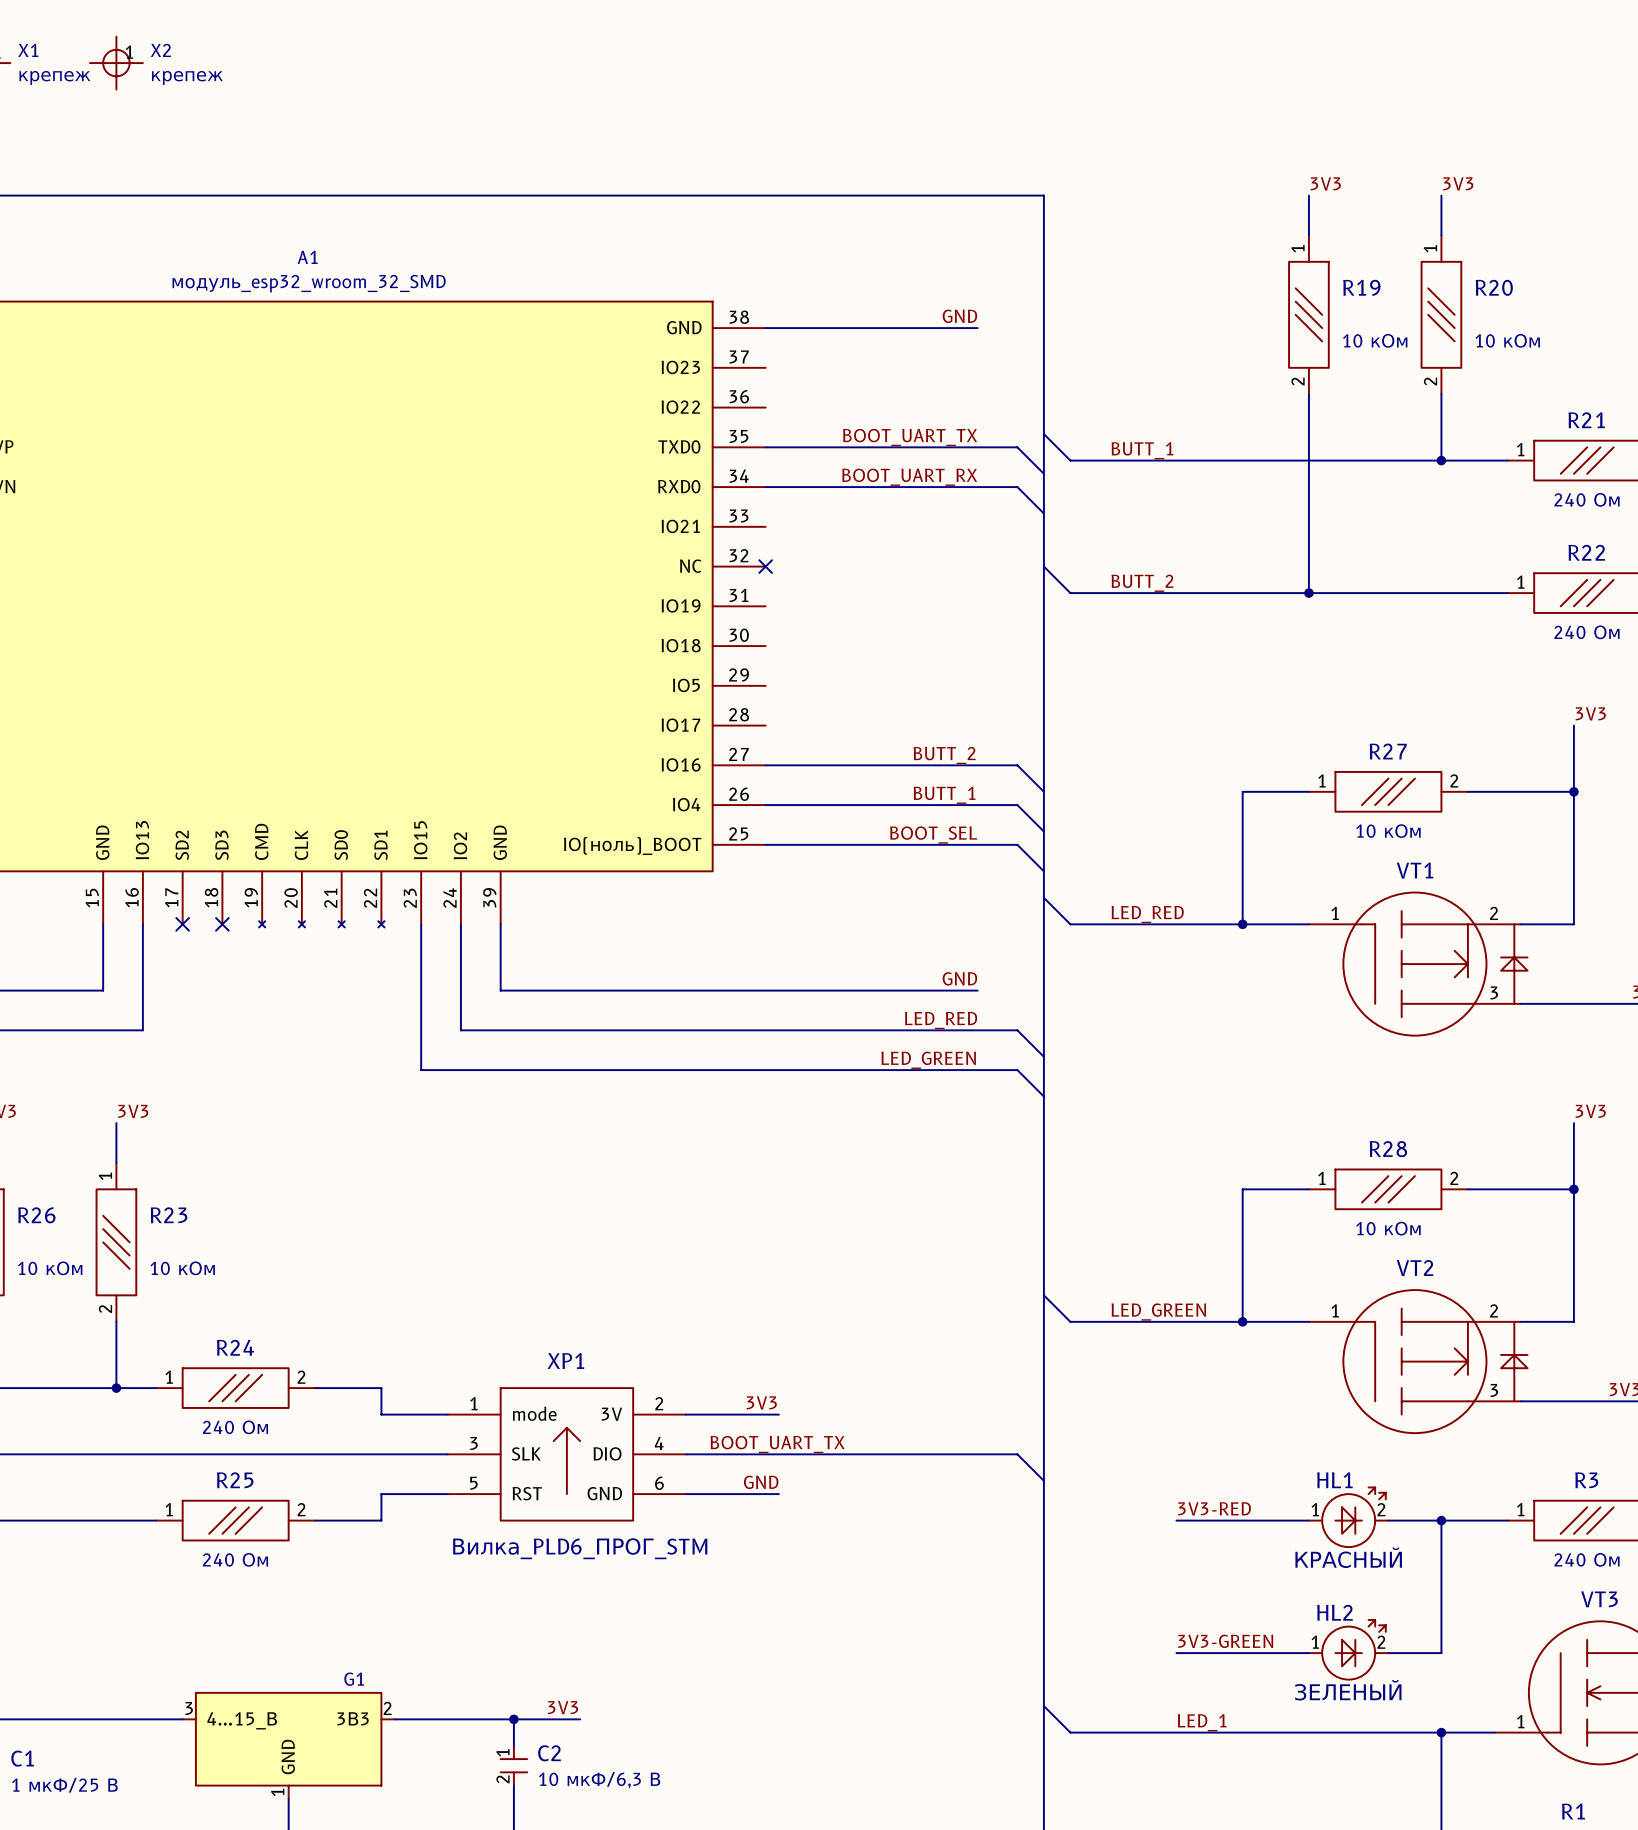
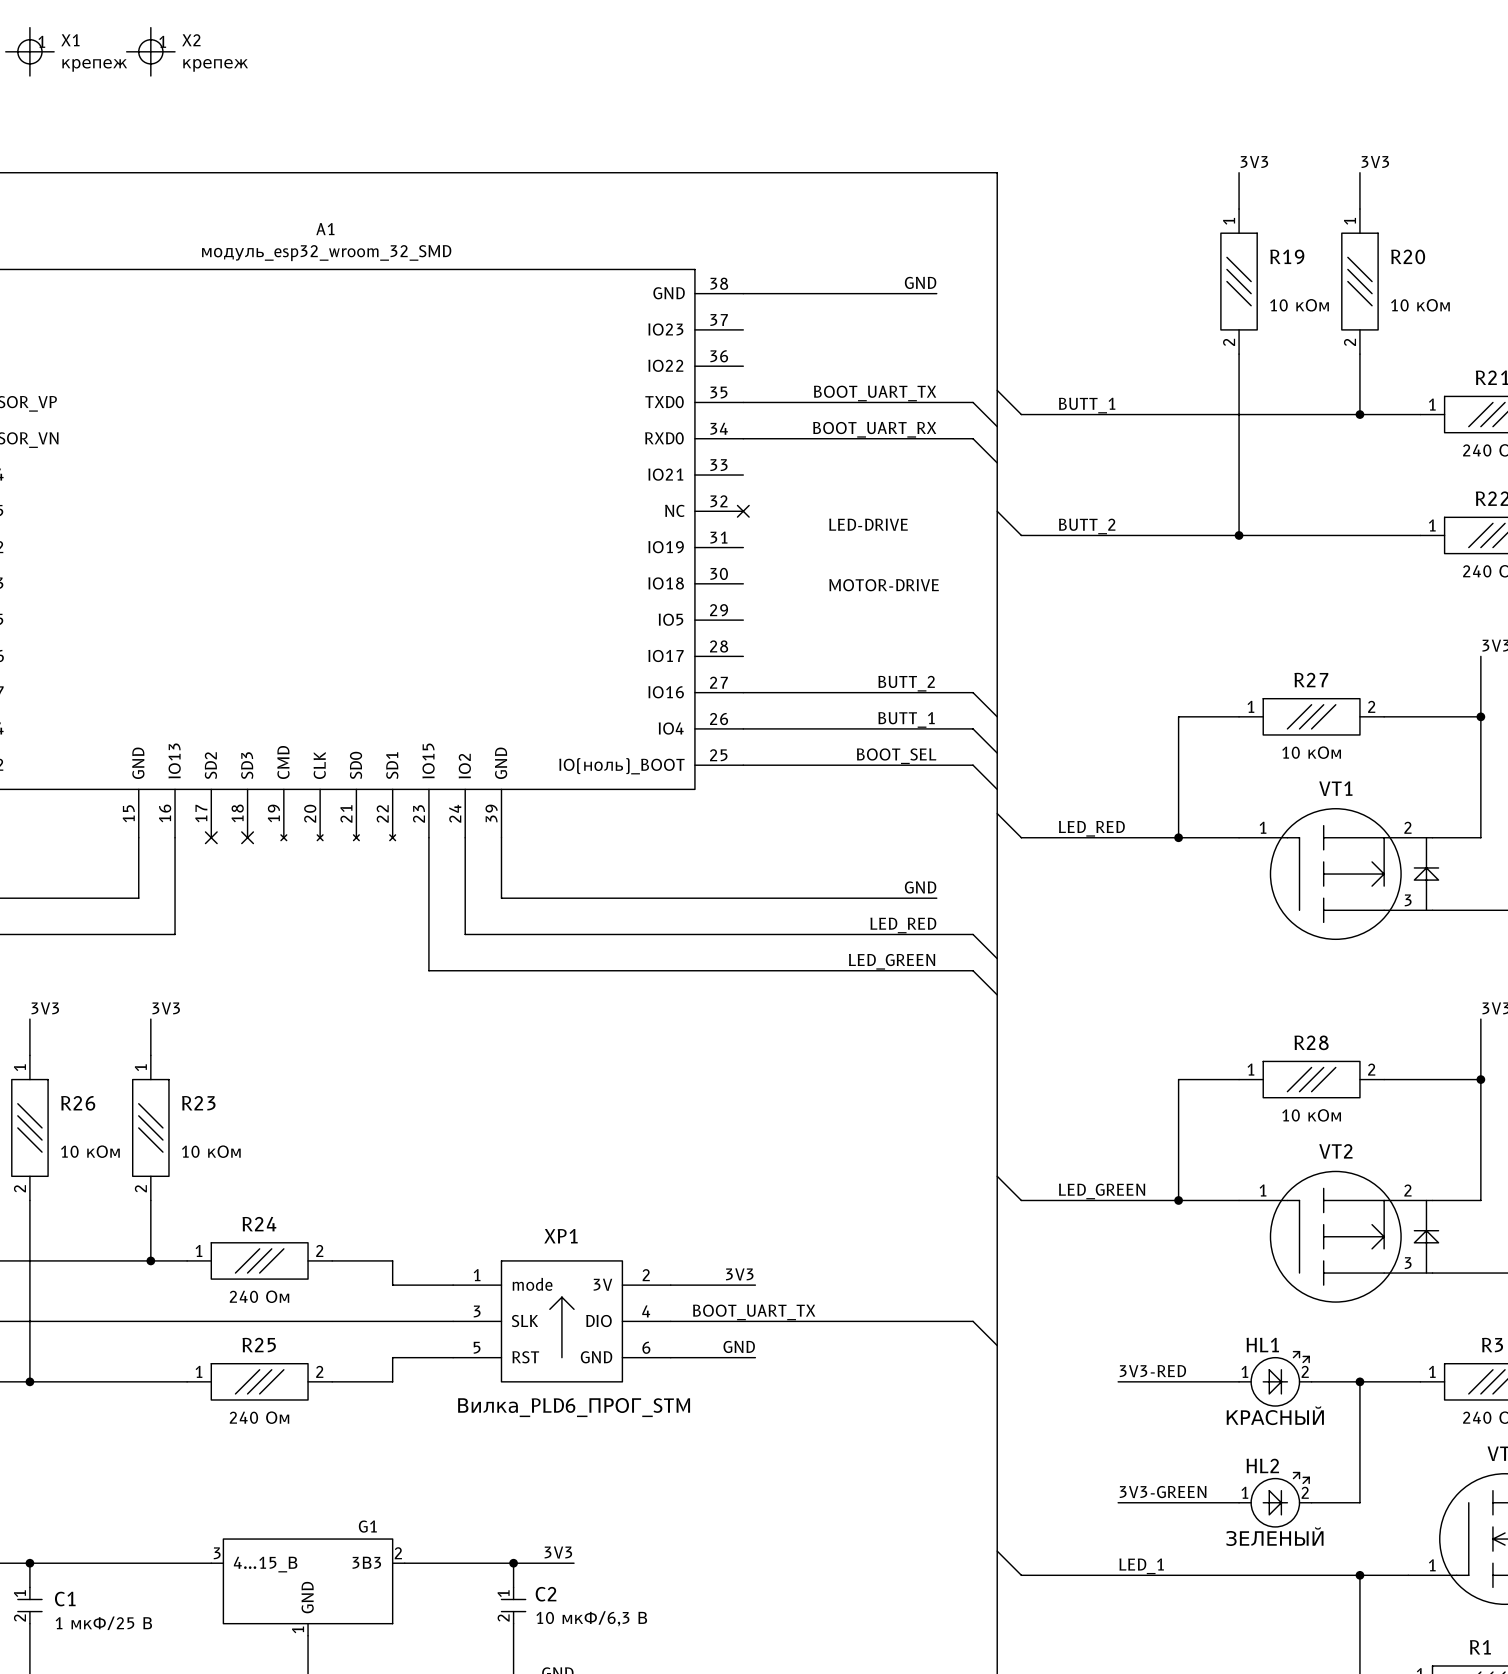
label: none -> LED-DRIVE (868, 524)
label: none -> MOTOR-DRIVE (884, 585)

